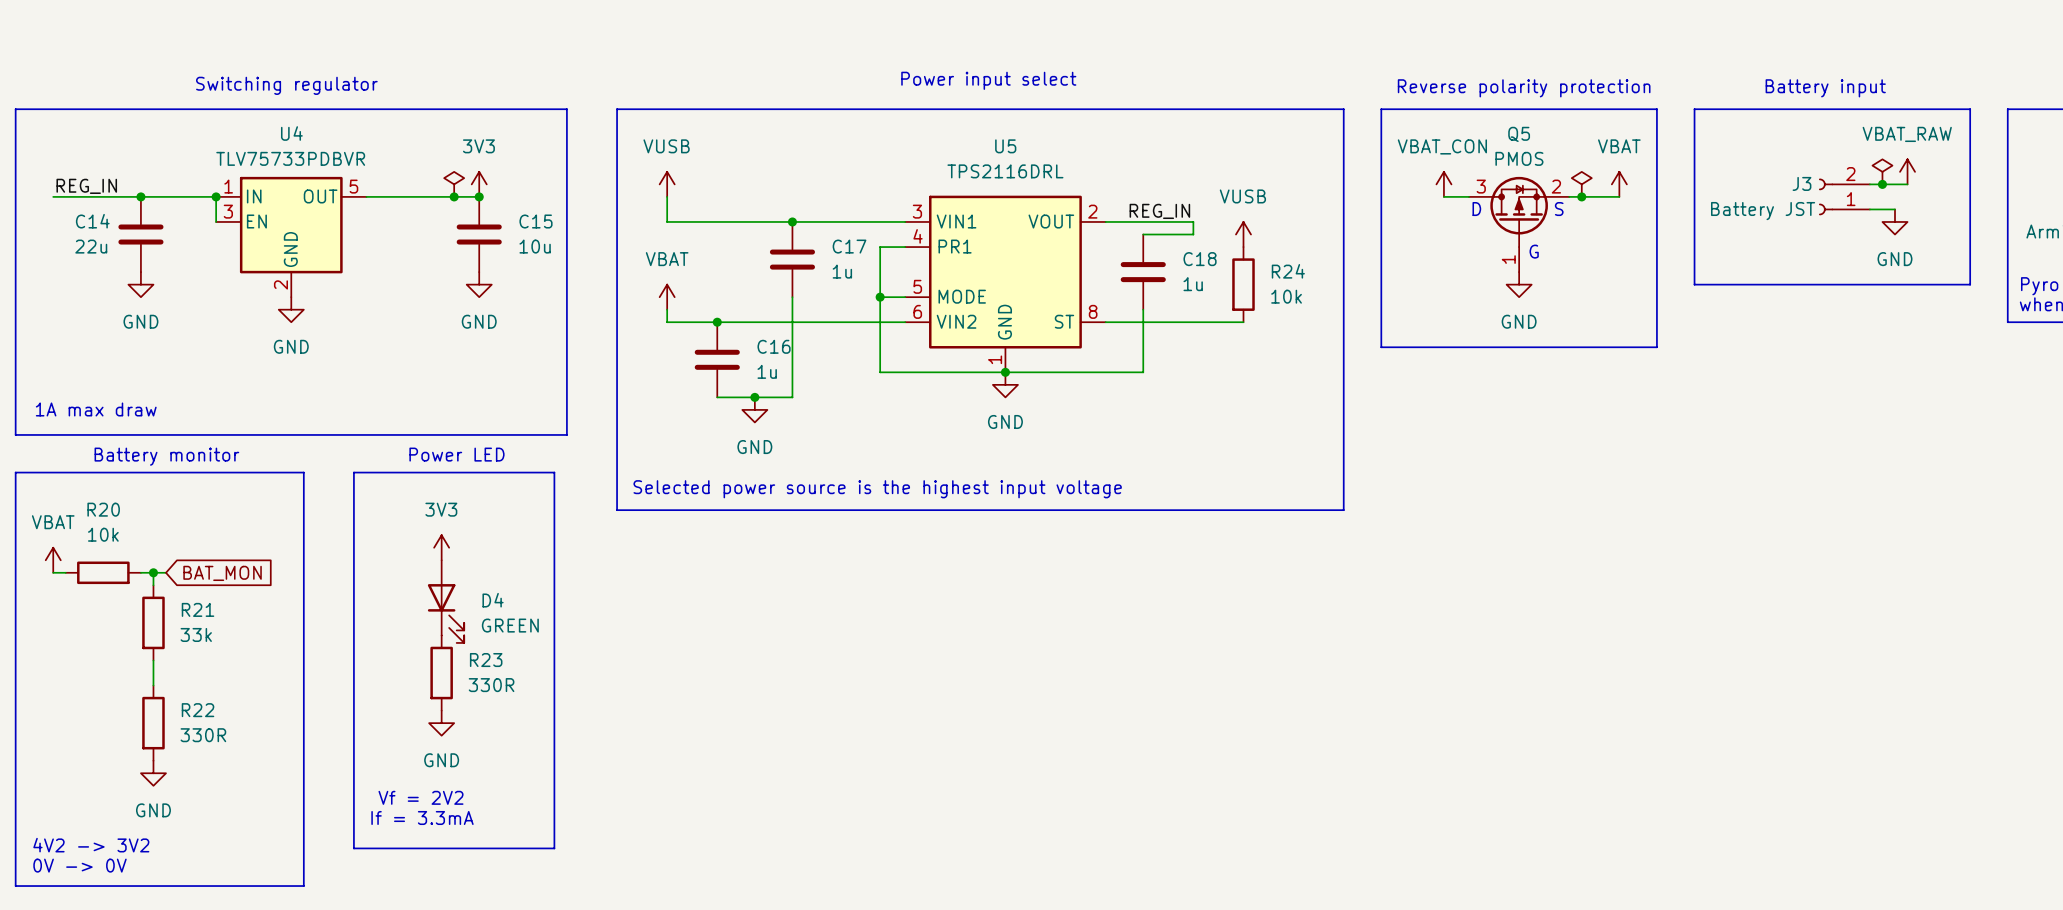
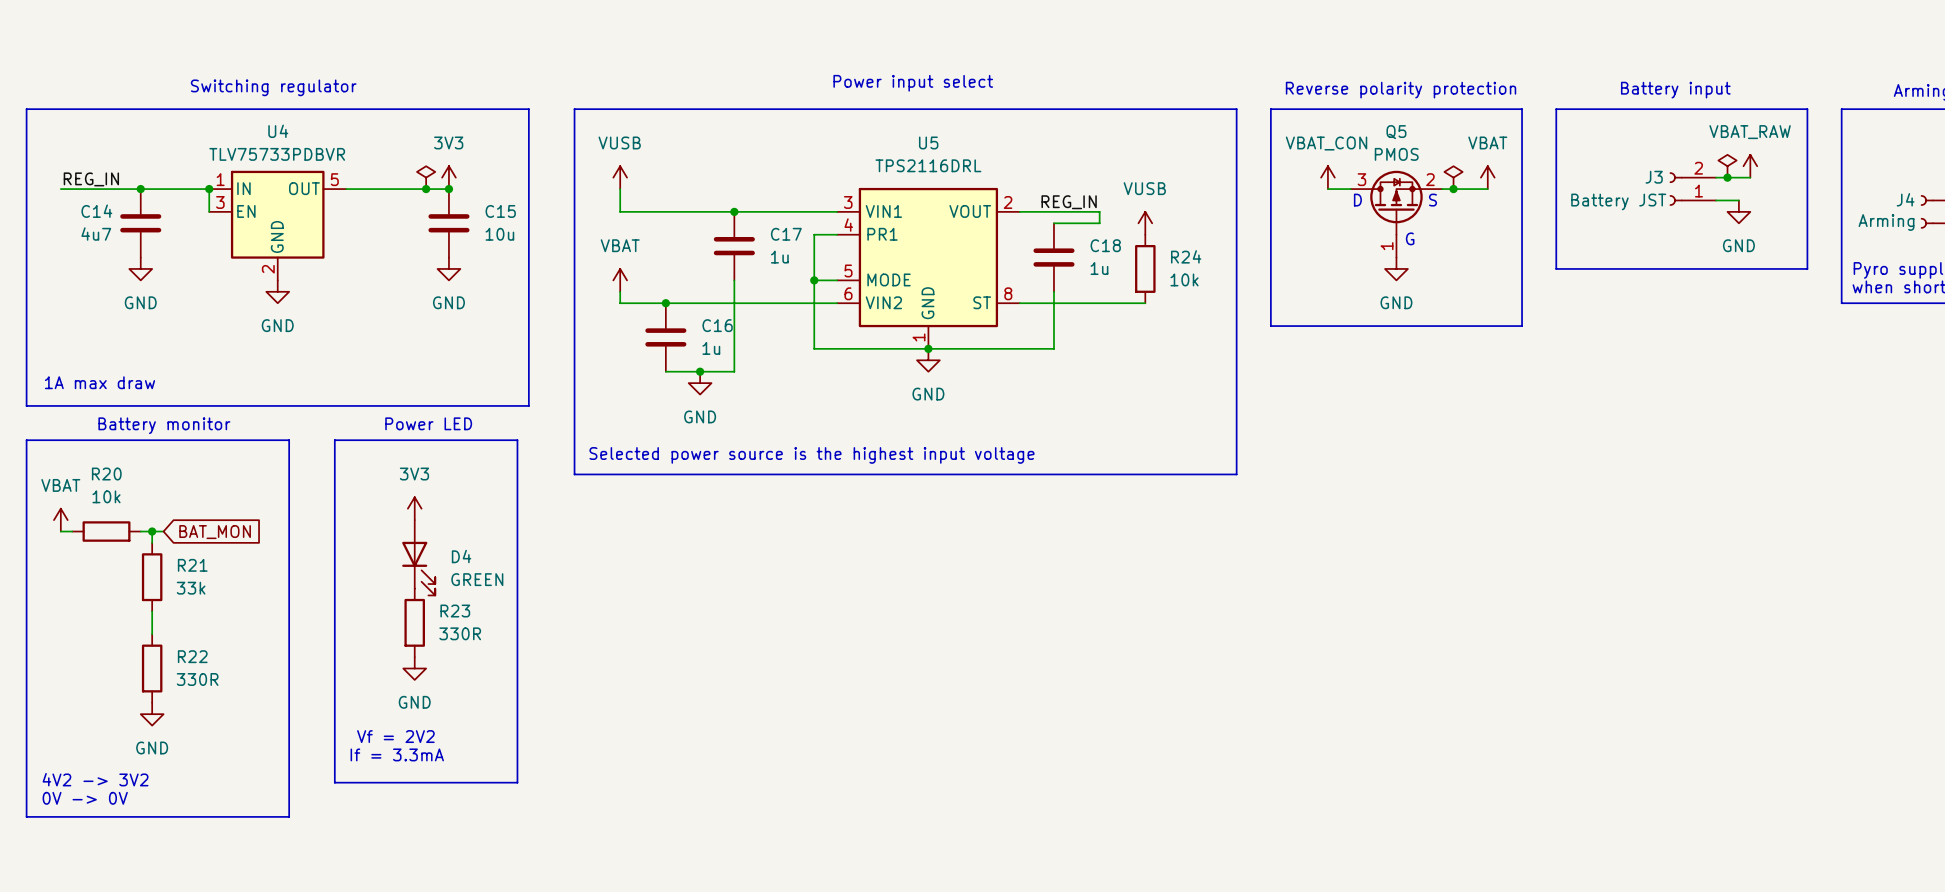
C14 value: 22u (91, 246) -> 4u7 (96, 234)

